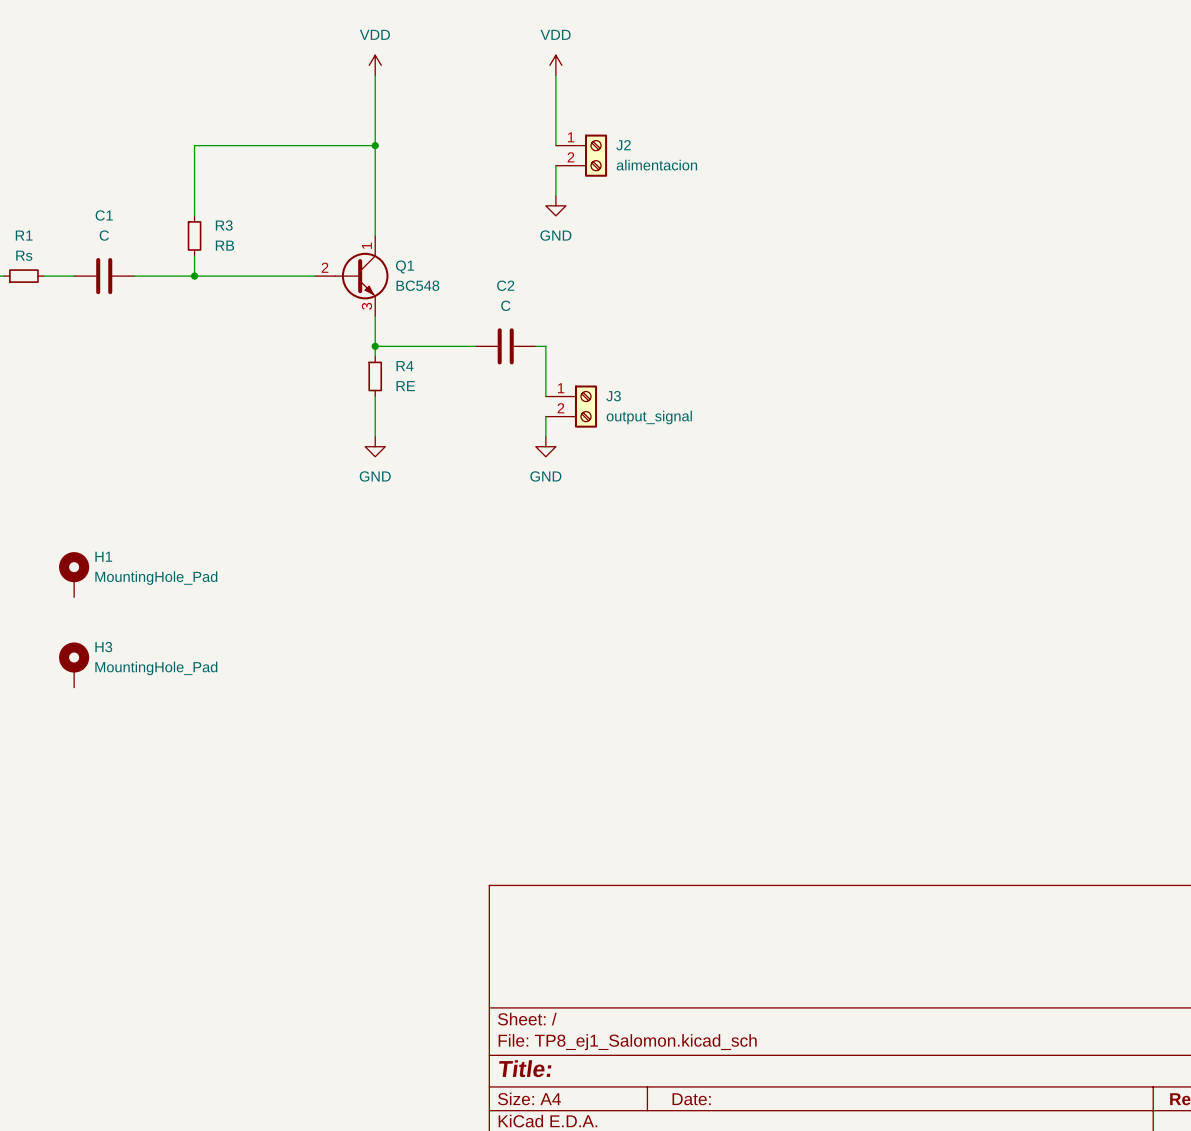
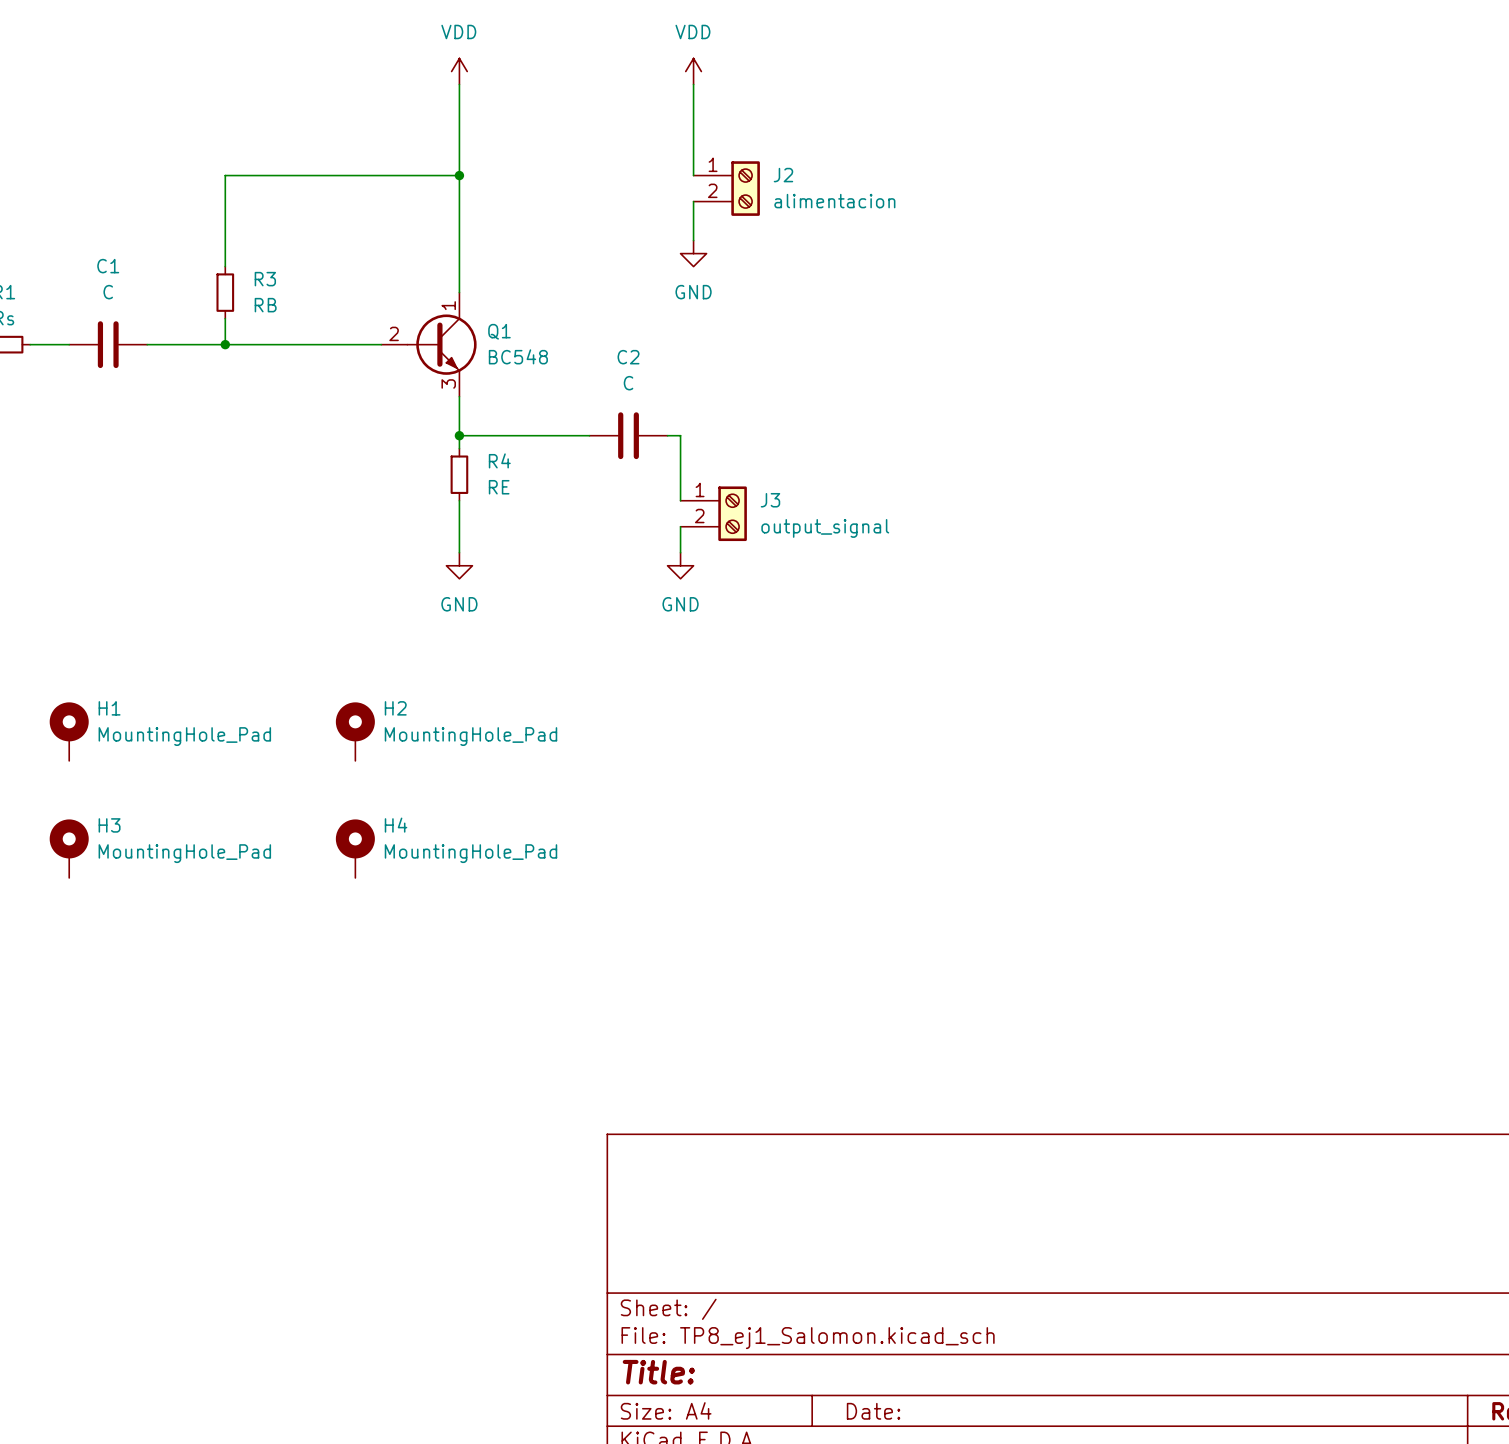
H2: none -> MountingHole_Pad (355, 731)
H4: none -> MountingHole_Pad (355, 848)

